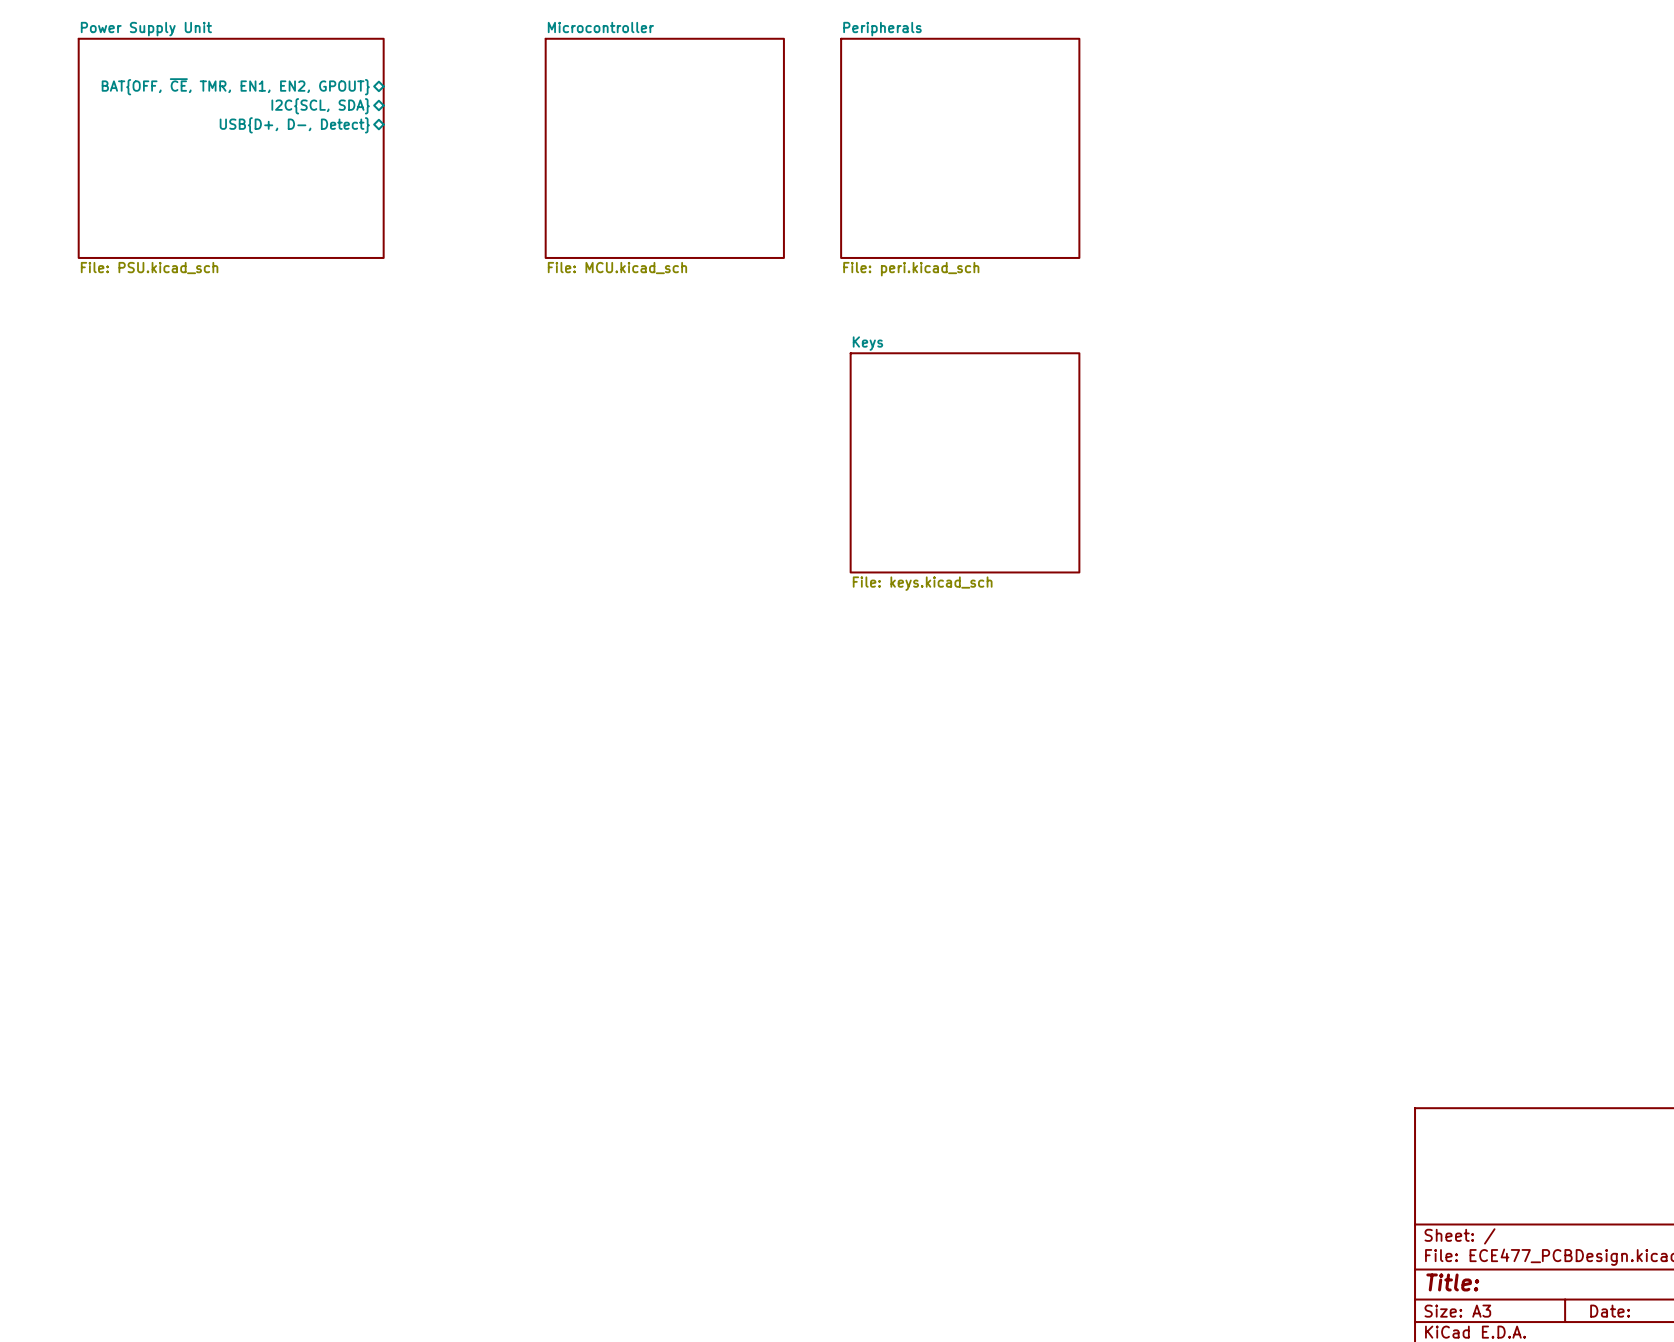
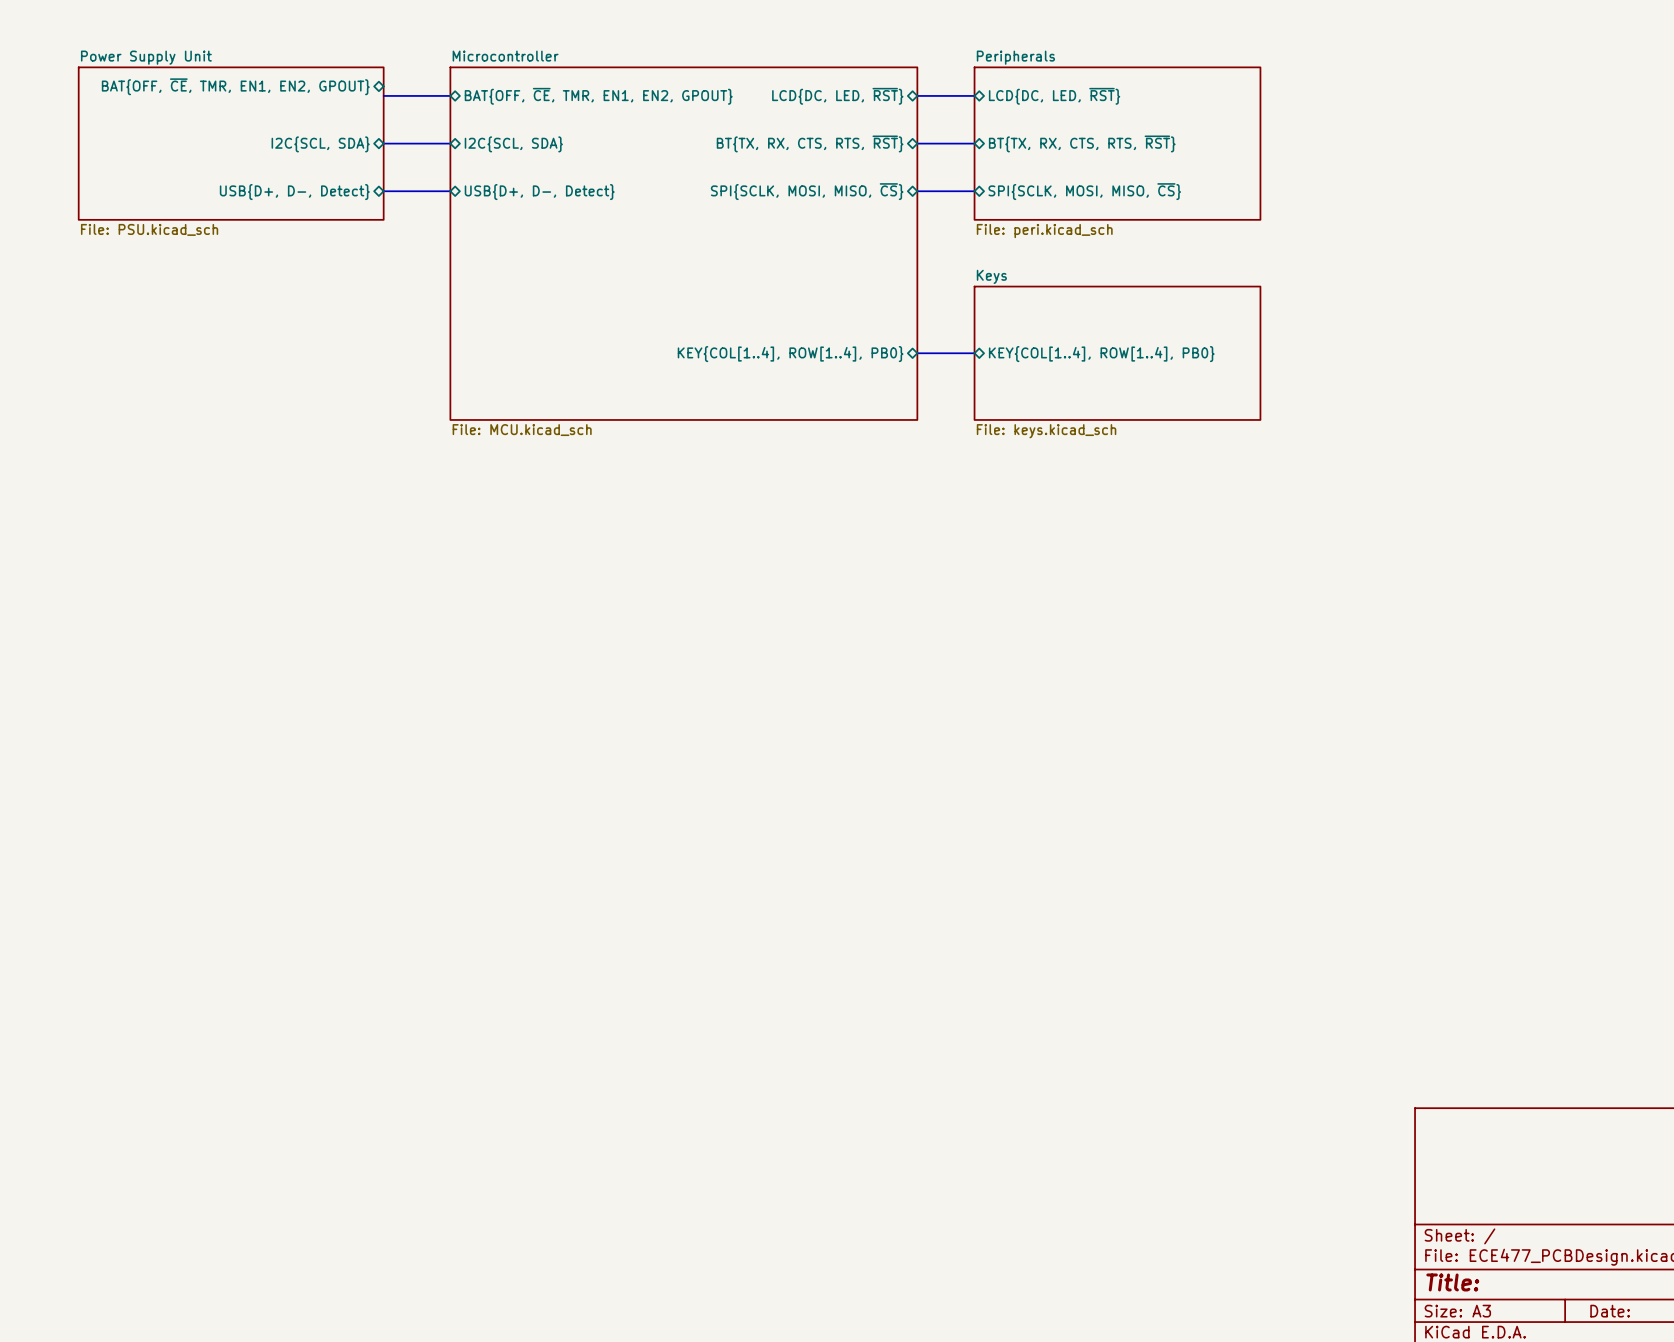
sheet Power Supply Unit name position: Power Supply Unit (146, 29) -> Power Supply Unit (146, 57)
sheet Power Supply Unit shape: [78, 38, 385, 259] -> [78, 66, 385, 221]
bus: none -> (383, 95) (450, 95)
bus: none -> (917, 95) (974, 95)
sheet pin: none -> BAT{OFF, ~{CE}, TMR, EN1, EN2, GPOUT} (598, 96)
sheet pin: none -> LCD{DC, LED, ~{RST}} (837, 96)
sheet pin: none -> LCD{DC, LED, ~{RST}} (1054, 96)
sheet pin position: I2C{SCL, SDA} (320, 106) -> I2C{SCL, SDA} (320, 144)
sheet pin: USB{D+, D-, Detect} (294, 125) -> none
bus: none -> (383, 143) (450, 143)
sheet pin: none -> BT{TX, RX, CTS, RTS, ~{RST}} (810, 143)
bus: none -> (917, 143) (974, 143)
sheet pin: none -> BT{TX, RX, CTS, RTS, ~{RST}} (1082, 143)
sheet Peripherals: none -> File: peri.kicad_sch (1117, 143)
sheet pin: none -> I2C{SCL, SDA} (513, 144)
sheet Microcontroller: File: MCU.kicad_sch (664, 148) -> none
sheet Peripherals: File: peri.kicad_sch (960, 148) -> none
bus: none -> (383, 191) (450, 191)
sheet pin: none -> SPI{SCLK, MOSI, MISO, ~{CS}} (807, 191)
bus: none -> (917, 191) (974, 191)
sheet pin: none -> SPI{SCLK, MOSI, MISO, ~{CS}} (1084, 191)
sheet pin: none -> USB{D+, D-, Detect} (294, 192)
sheet pin: none -> USB{D+, D-, Detect} (539, 192)
sheet Microcontroller: none -> File: MCU.kicad_sch (683, 243)
sheet Power Supply Unit value position: File: PSU.kicad_sch (149, 268) -> File: PSU.kicad_sch (149, 229)
bus: none -> (917, 353) (974, 353)
sheet Keys: none -> File: keys.kicad_sch (1117, 353)
sheet pin: none -> KEY{COL[1..4], ROW[1..4], PB0} (790, 354)
sheet pin: none -> KEY{COL[1..4], ROW[1..4], PB0} (1101, 354)
sheet Keys: File: keys.kicad_sch (965, 462) -> none

